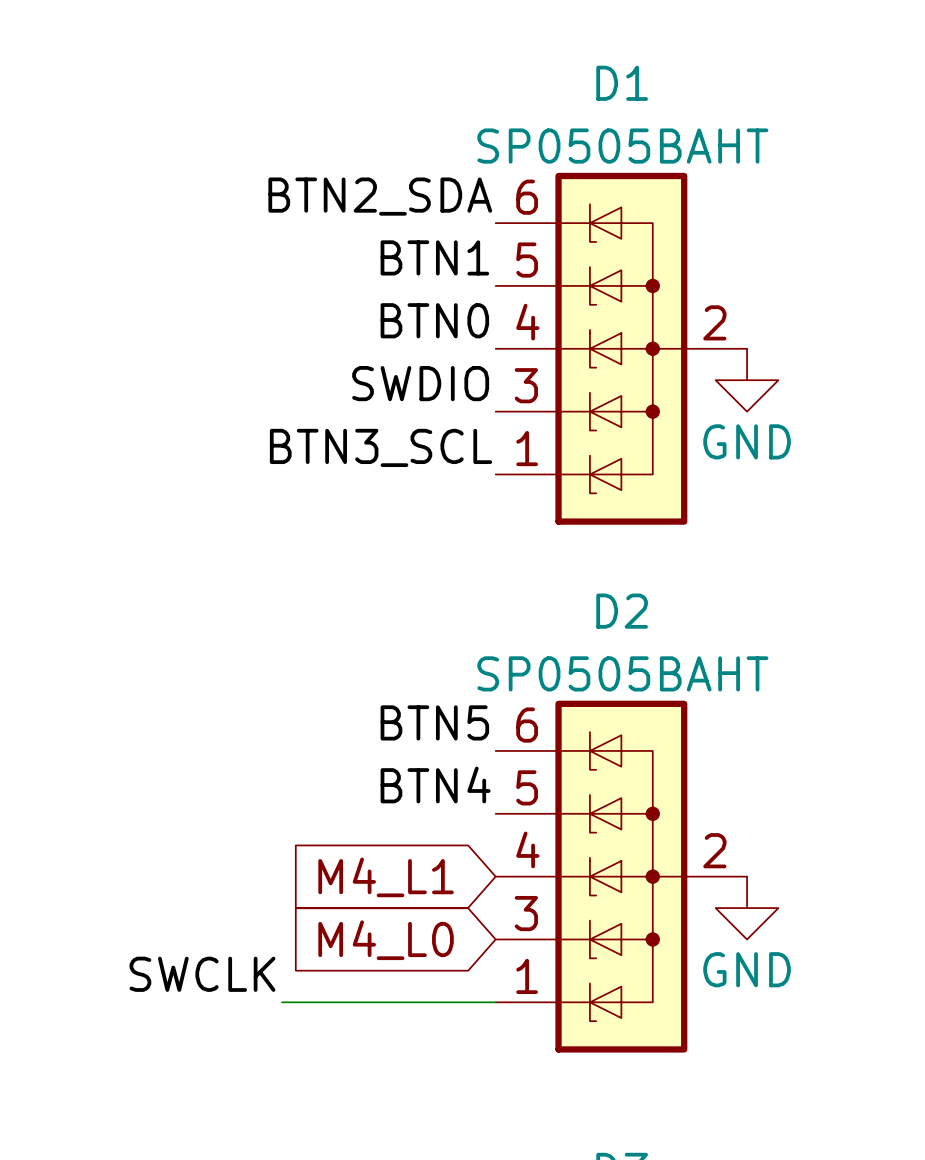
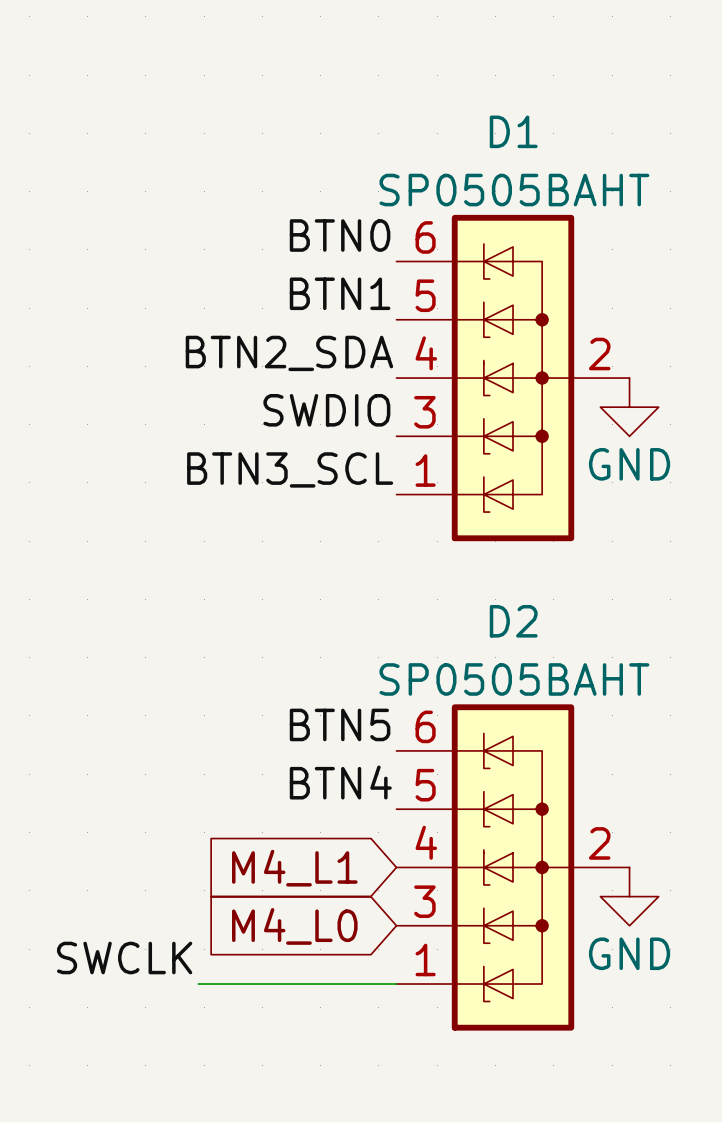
label: BTN2_SDA (380, 196) -> BTN0 (340, 235)
label: BTN0 (434, 320) -> BTN2_SDA (289, 353)

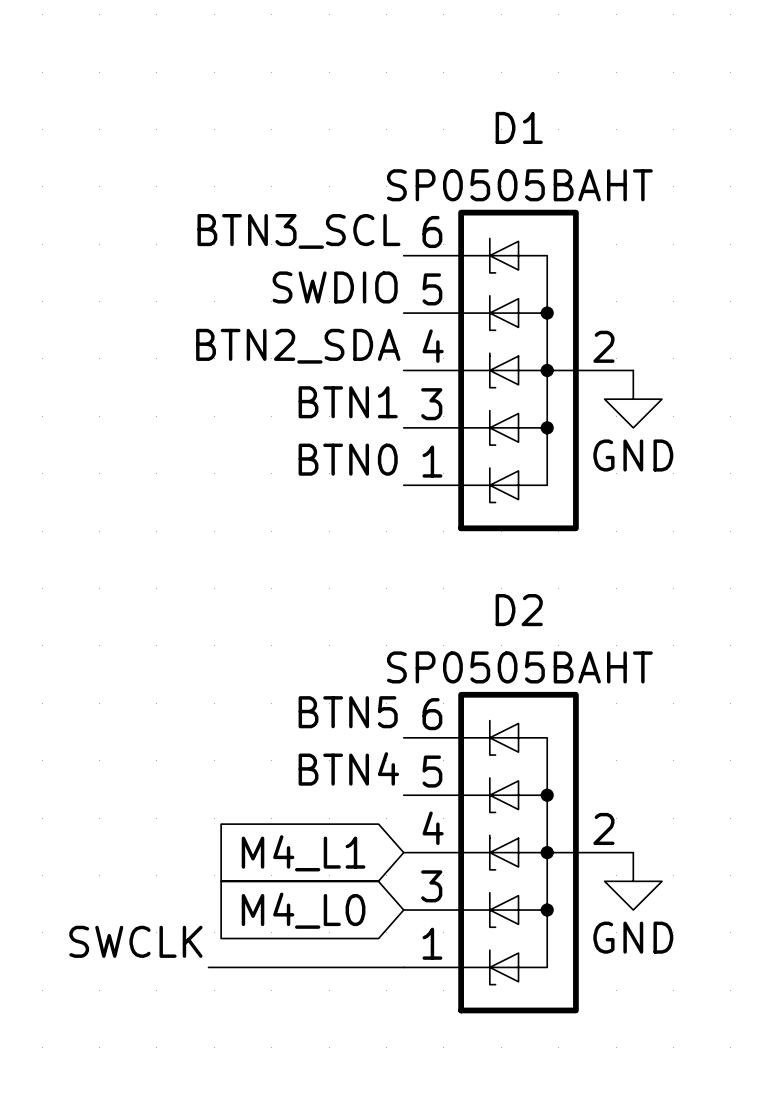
label: BTN0 (340, 235) -> BTN3_SCL (298, 231)
label: BTN1 (340, 293) -> SWDIO (335, 287)
label: SWDIO (326, 410) -> BTN1 (348, 402)
label: BTN3_SCL (290, 469) -> BTN0 (348, 459)

